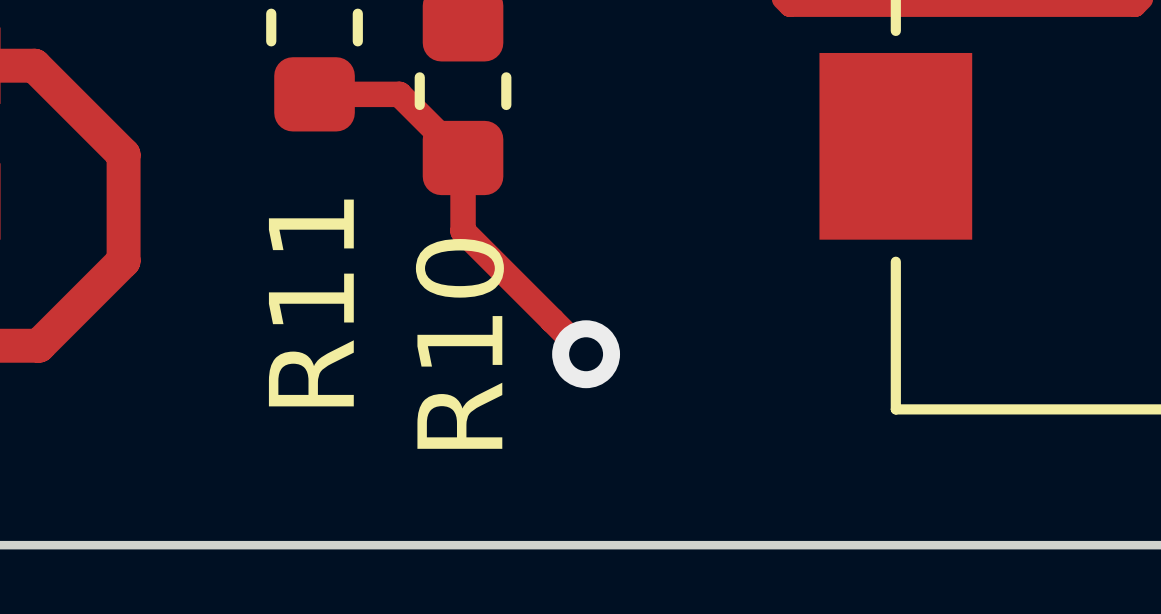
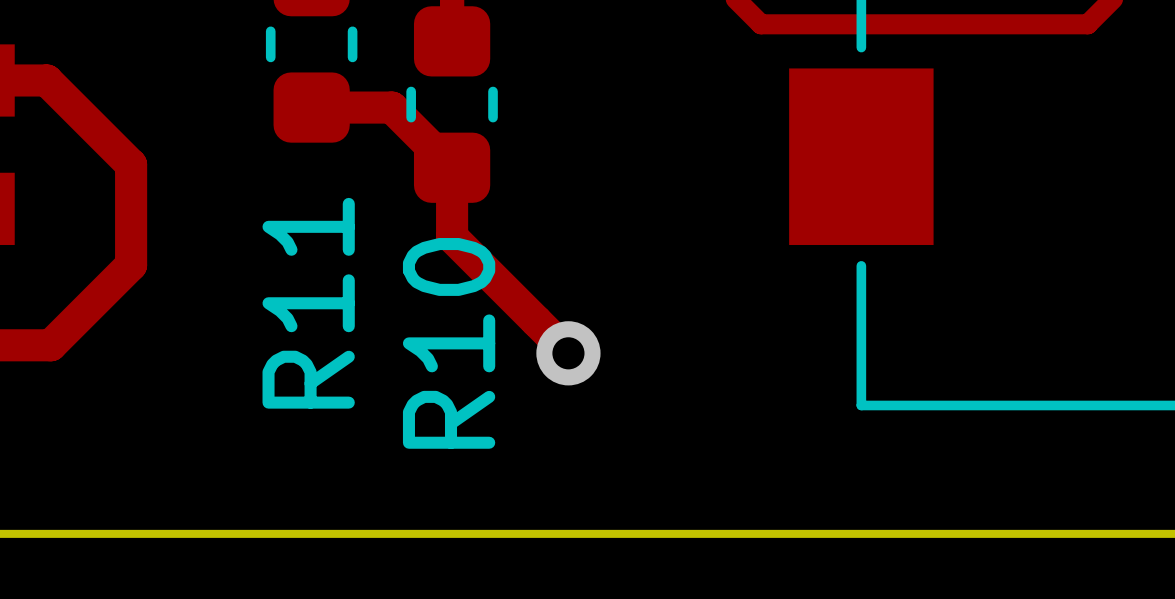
track width: thin (314, 94) (399, 94) (463, 157) (463, 231) (586, 354) -> thick (311, 107) (391, 107) (452, 167) (452, 236) (568, 353)

